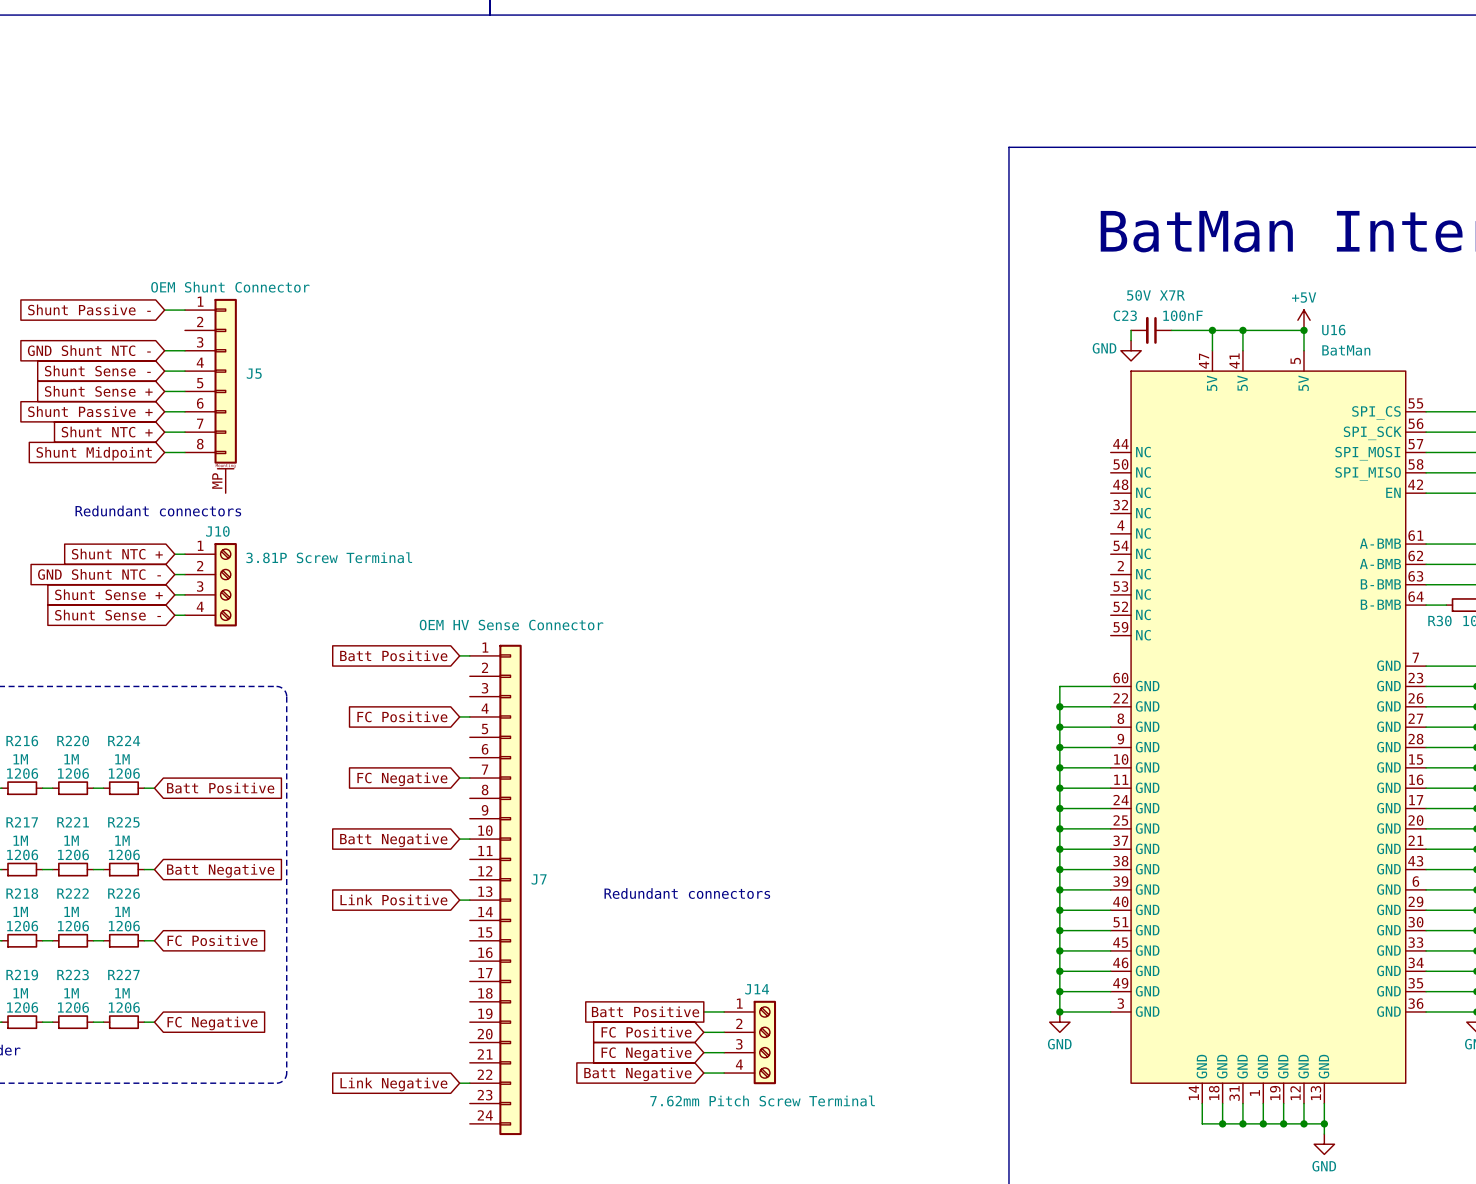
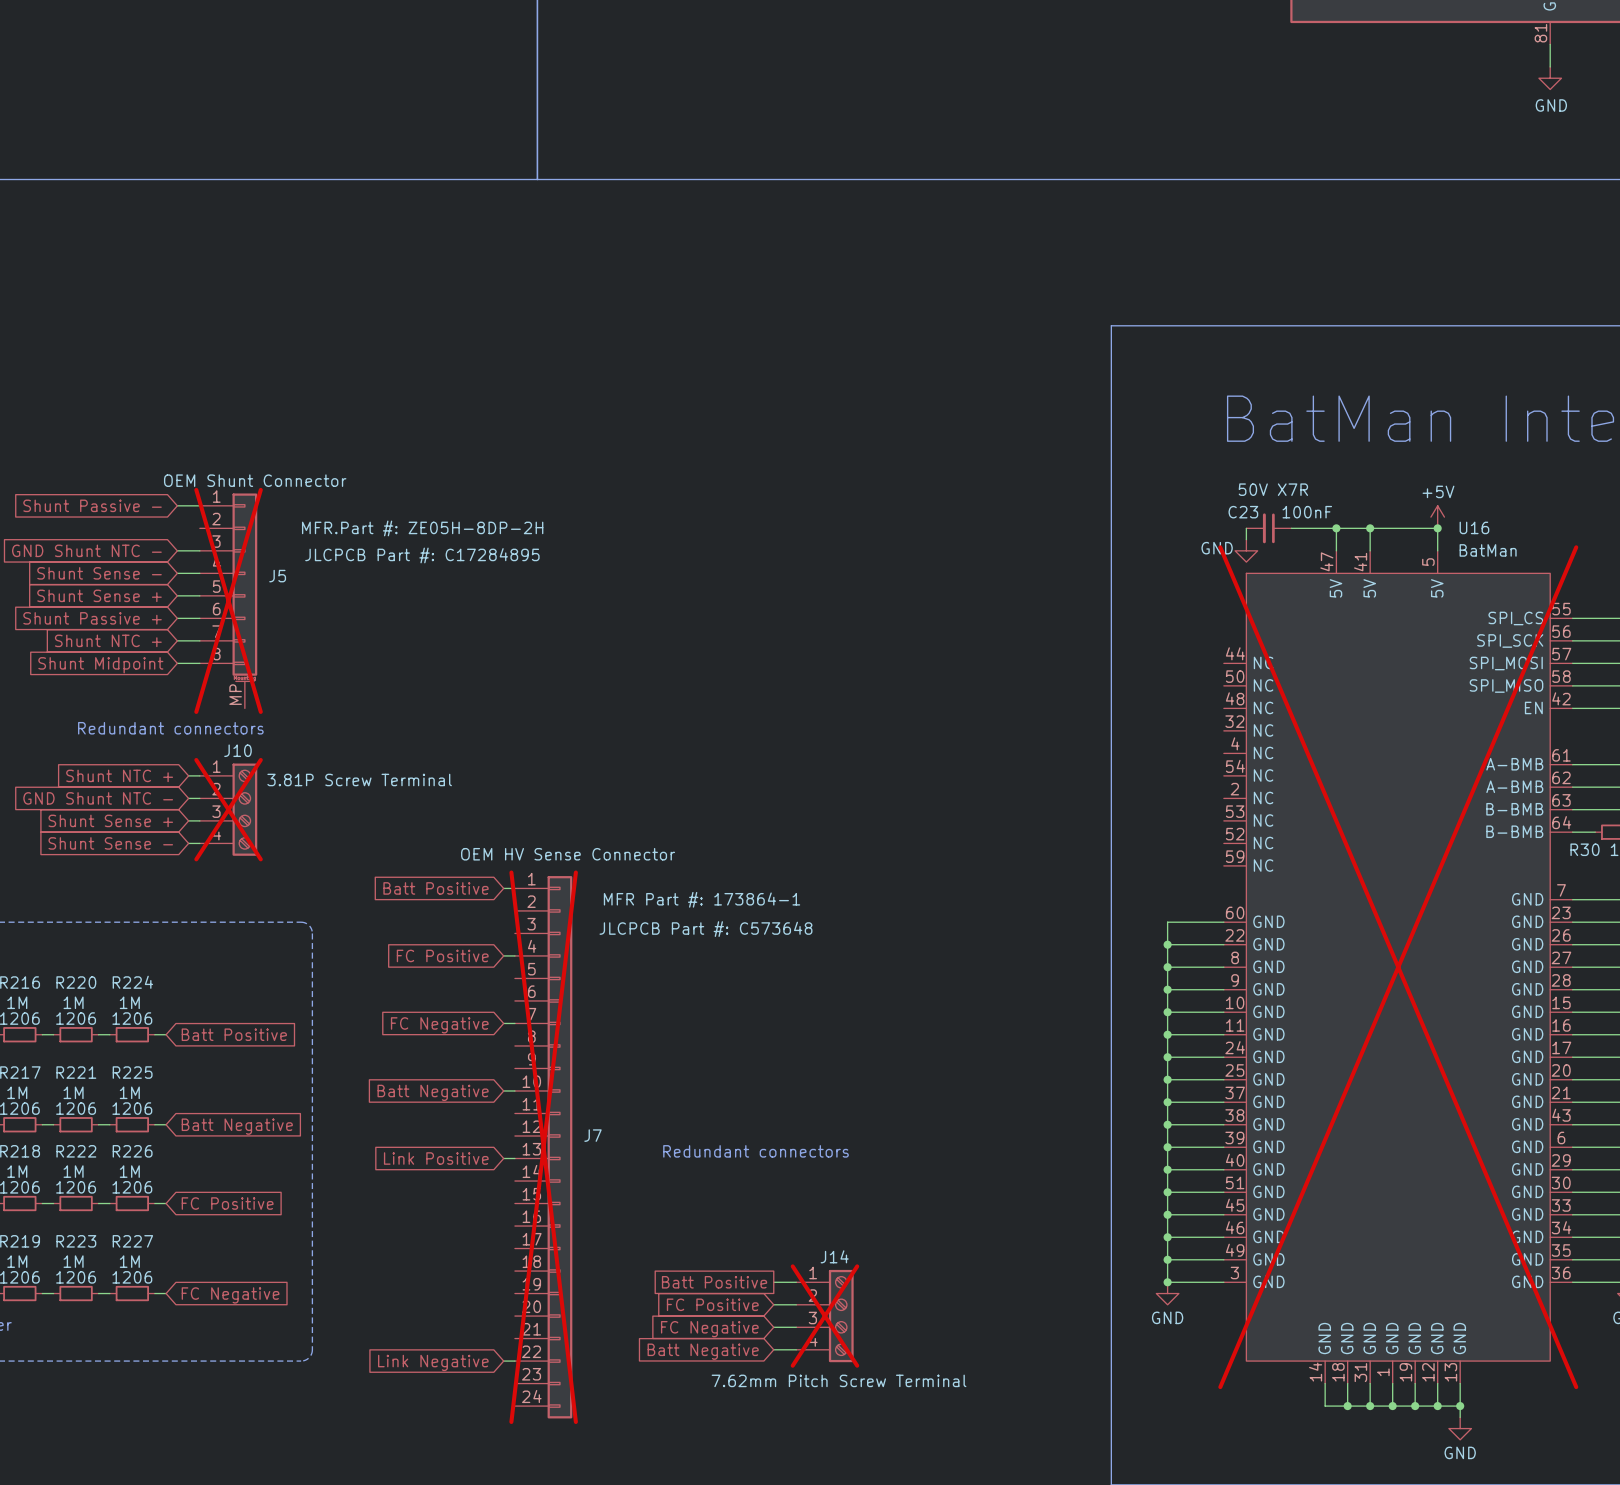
J5 text: none -> MFR.Part #: ZE05H-8DP-2H (422, 528)
J5 text: none -> JLCPCB Part #: C17284895 (422, 555)
J5 do-not-place cross: none -> (228, 600)
J10 do-not-place cross: none -> (228, 809)
J7 text: none -> MFR Part #: 173864-1 (702, 899)
J7 text: none -> JLCPCB Part #: C573648 (705, 929)
U16 do-not-place cross: none -> (1398, 967)
J7 do-not-place cross: none -> (543, 1147)
J14 do-not-place cross: none -> (824, 1316)

